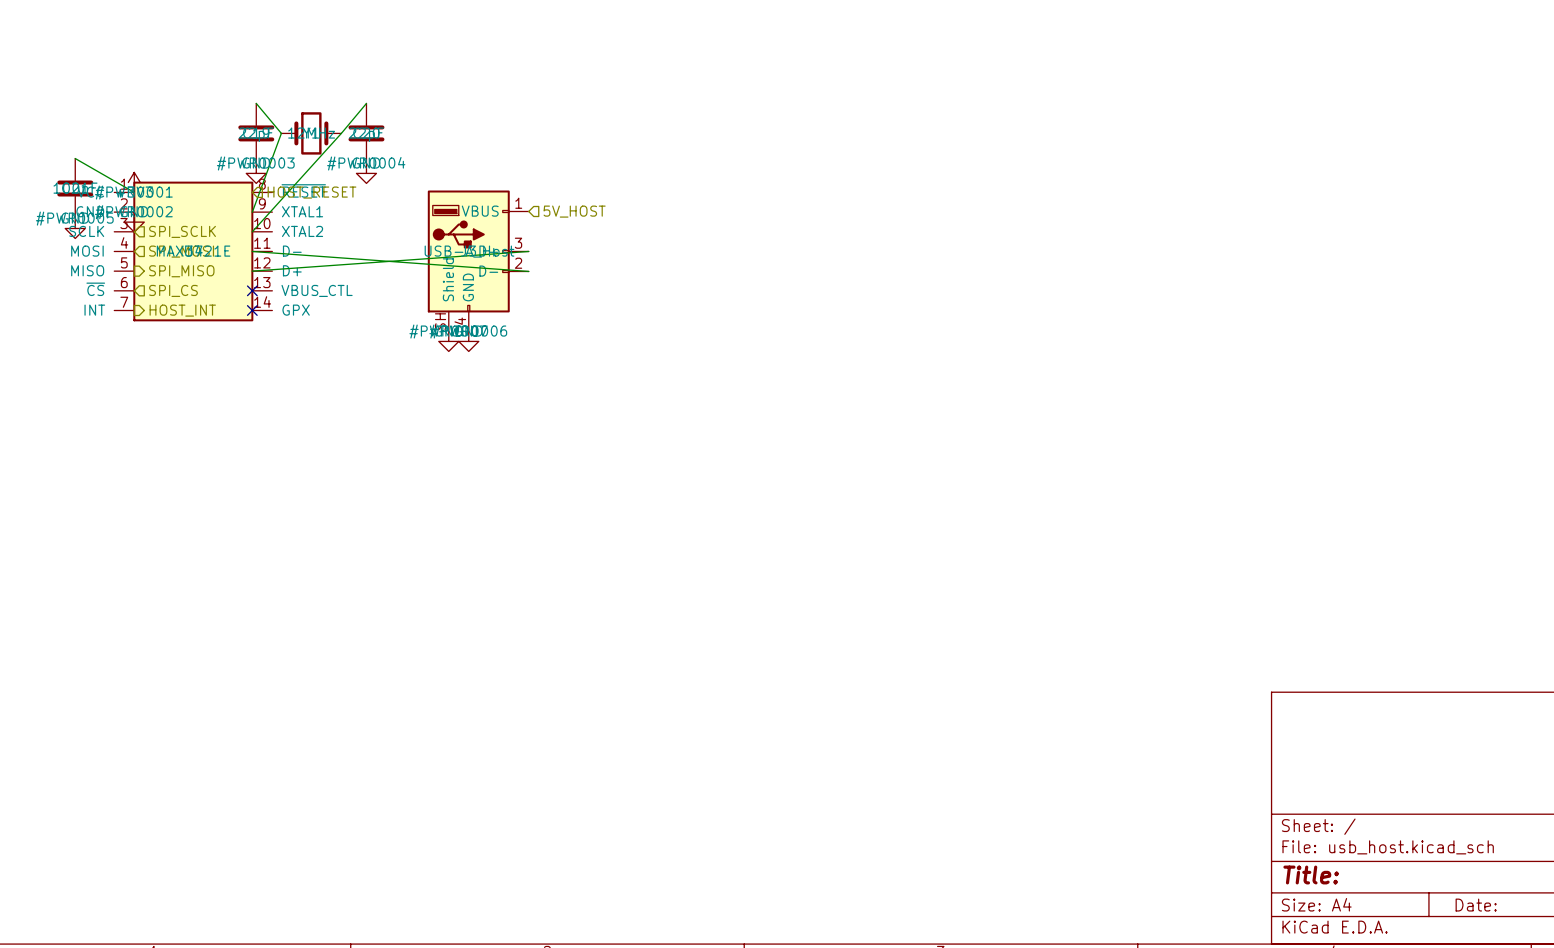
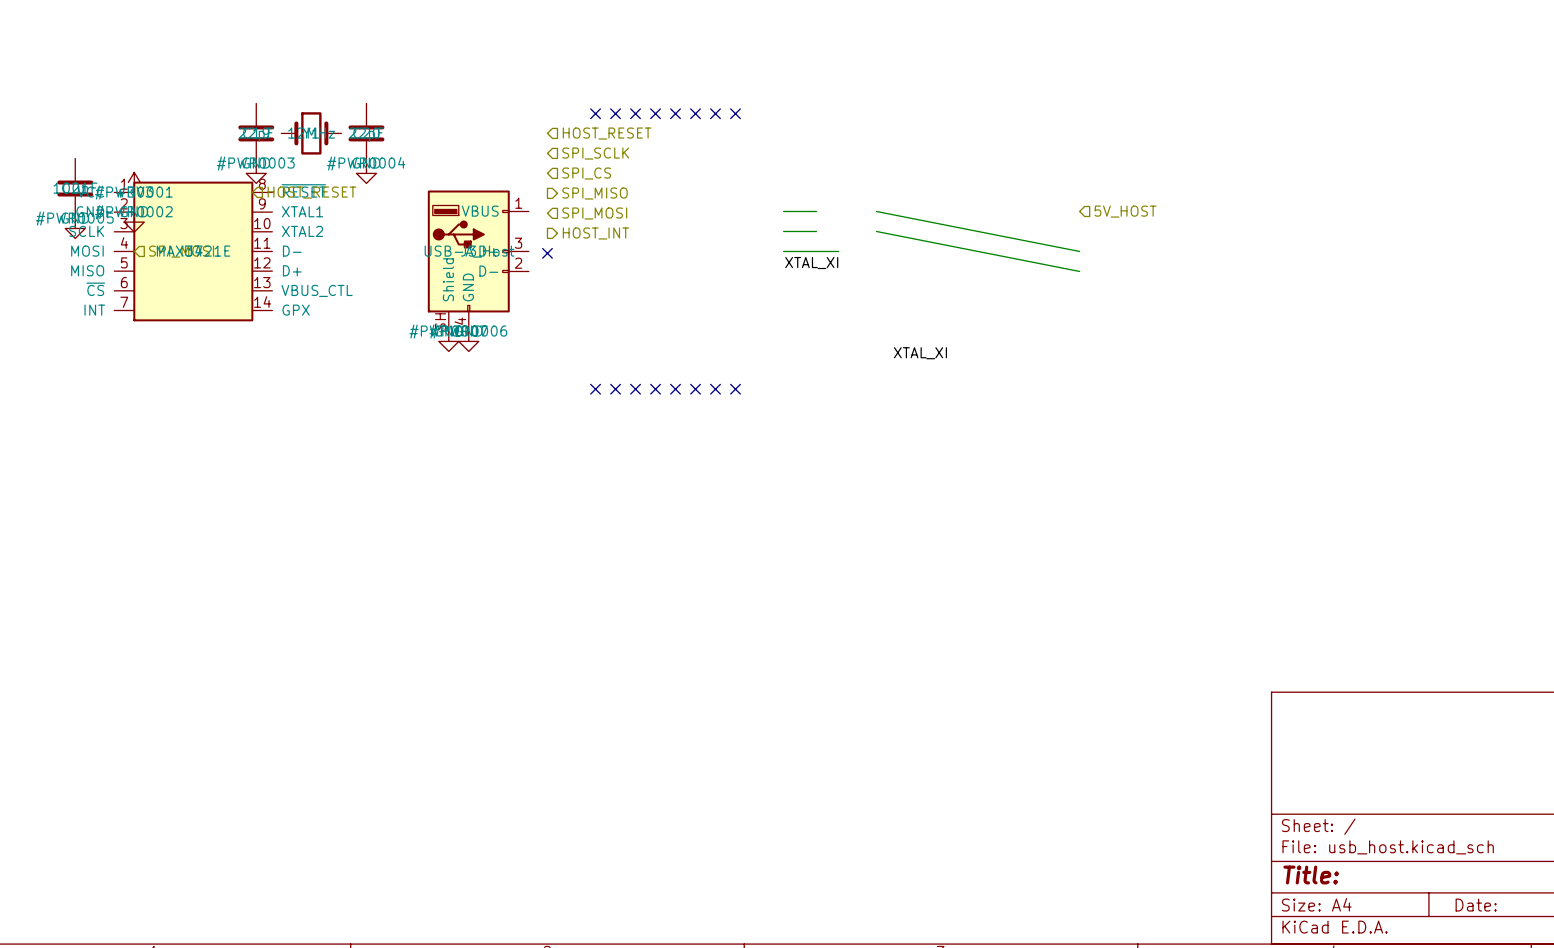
wire: (256, 103) (281, 133) (252, 212) -> none
wire: (366, 103) (252, 231) -> none
no-connect mark: none -> (595, 113)
no-connect mark: none -> (615, 113)
no-connect mark: none -> (635, 113)
no-connect mark: none -> (655, 113)
no-connect mark: none -> (675, 113)
no-connect mark: none -> (695, 113)
no-connect mark: none -> (715, 113)
no-connect mark: none -> (735, 113)
hierarchical label: none -> HOST_RESET (607, 133)
hierarchical label: none -> SPI_SCLK (595, 153)
wire: (75, 158) (134, 192) -> none
hierarchical label: none -> SPI_CS (586, 173)
hierarchical label: none -> SPI_MISO (594, 193)
hierarchical label: 5V_HOST (574, 211) -> none
wire: none -> (783, 211) (816, 211)
wire: none -> (876, 211) (1079, 251)
hierarchical label: none -> 5V_HOST (1125, 211)
hierarchical label: none -> SPI_MOSI (594, 213)
hierarchical label: SPI_SCLK (182, 231) -> none
wire: none -> (783, 231) (816, 231)
wire: none -> (876, 231) (1079, 271)
hierarchical label: none -> HOST_INT (595, 233)
wire: (252, 251) (528, 271) -> none
wire: (528, 251) (252, 271) -> none
wire: none -> (783, 251) (838, 251)
no-connect mark: none -> (547, 253)
label: none -> XTAL_XI (811, 263)
hierarchical label: SPI_MISO (181, 271) -> none
hierarchical label: SPI_CS (173, 290) -> none
no-connect mark: (252, 290) -> none
hierarchical label: HOST_INT (182, 310) -> none
no-connect mark: (252, 310) -> none
label: none -> XTAL_XI (920, 353)
no-connect mark: none -> (595, 389)
no-connect mark: none -> (615, 389)
no-connect mark: none -> (635, 389)
no-connect mark: none -> (655, 389)
no-connect mark: none -> (675, 389)
no-connect mark: none -> (695, 389)
no-connect mark: none -> (715, 389)
no-connect mark: none -> (735, 389)

